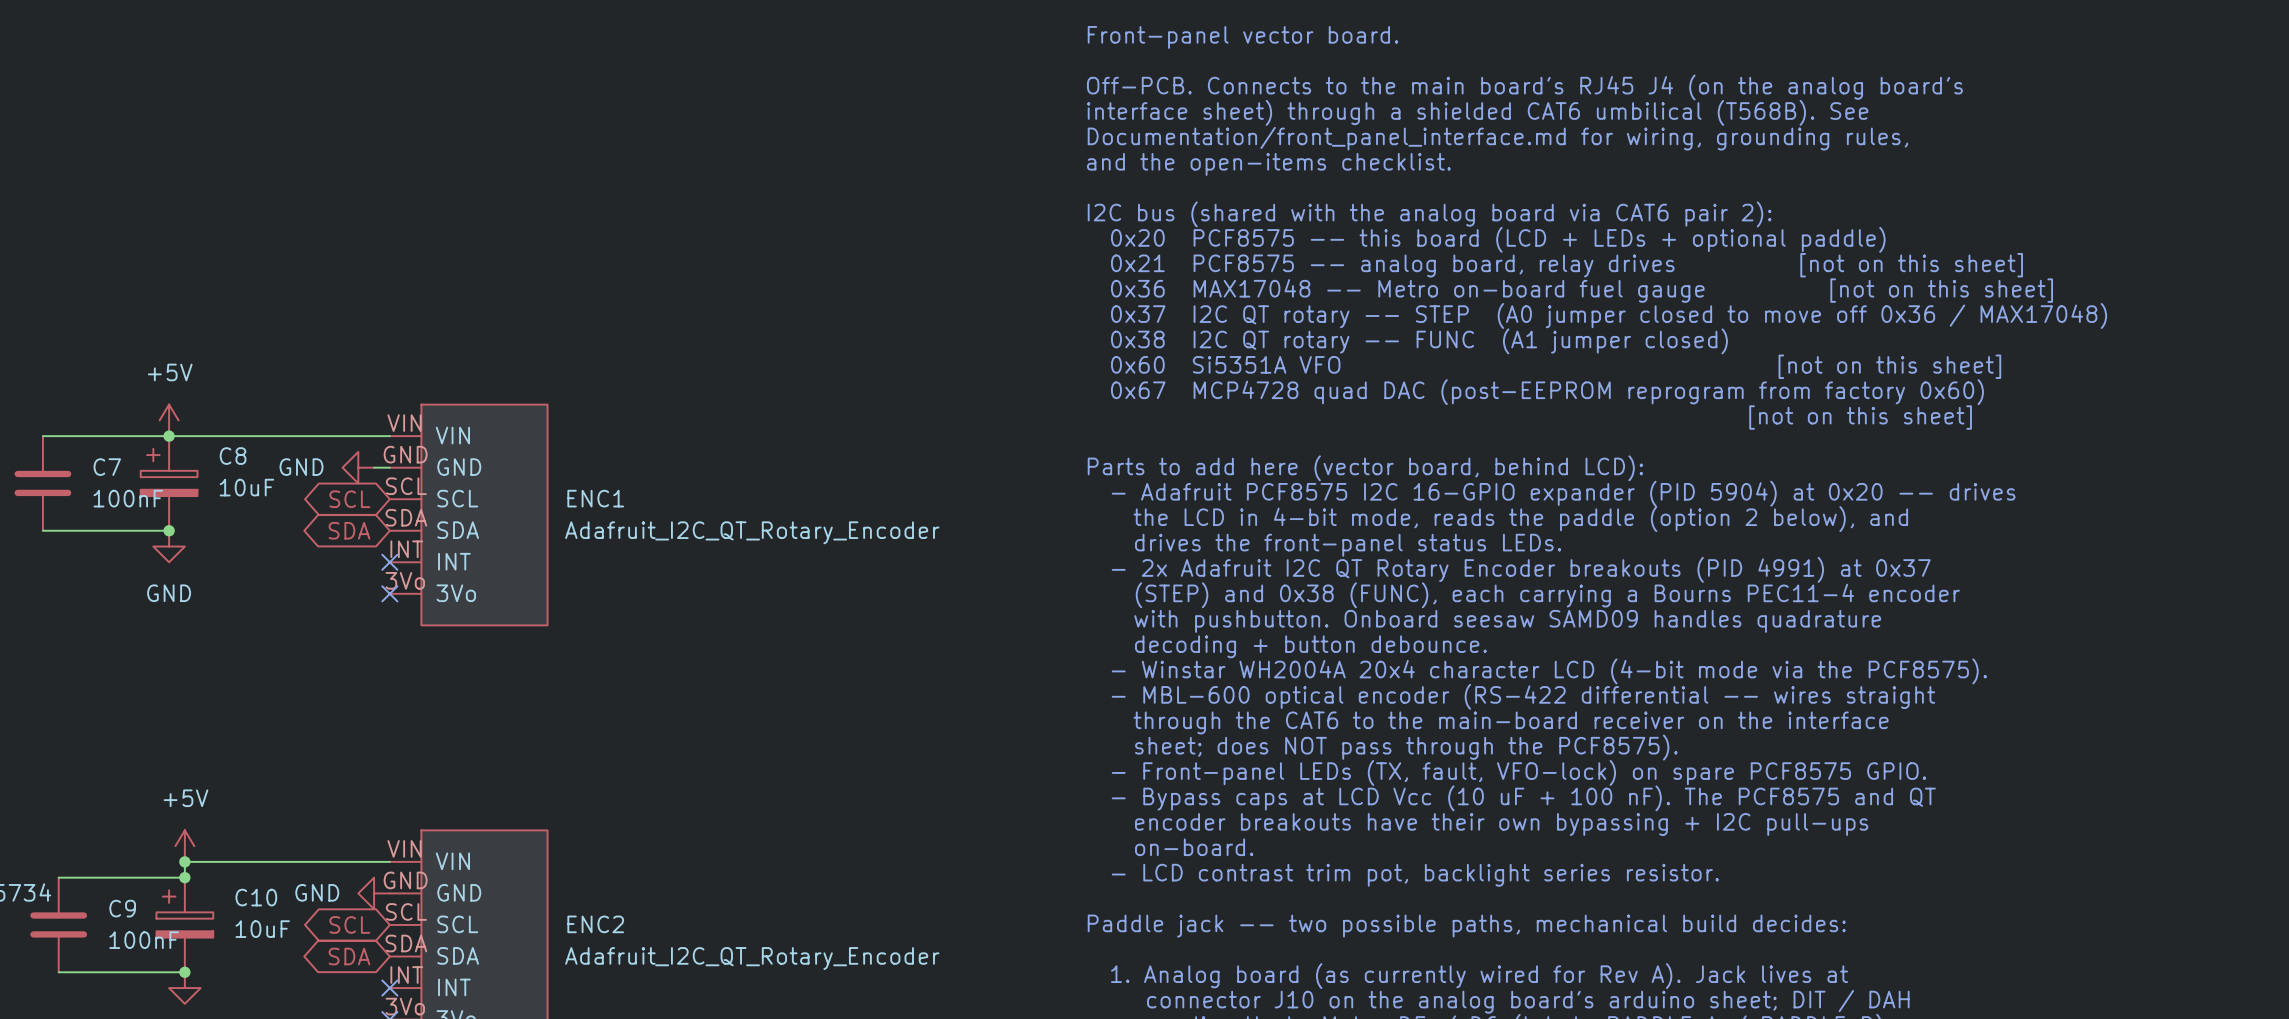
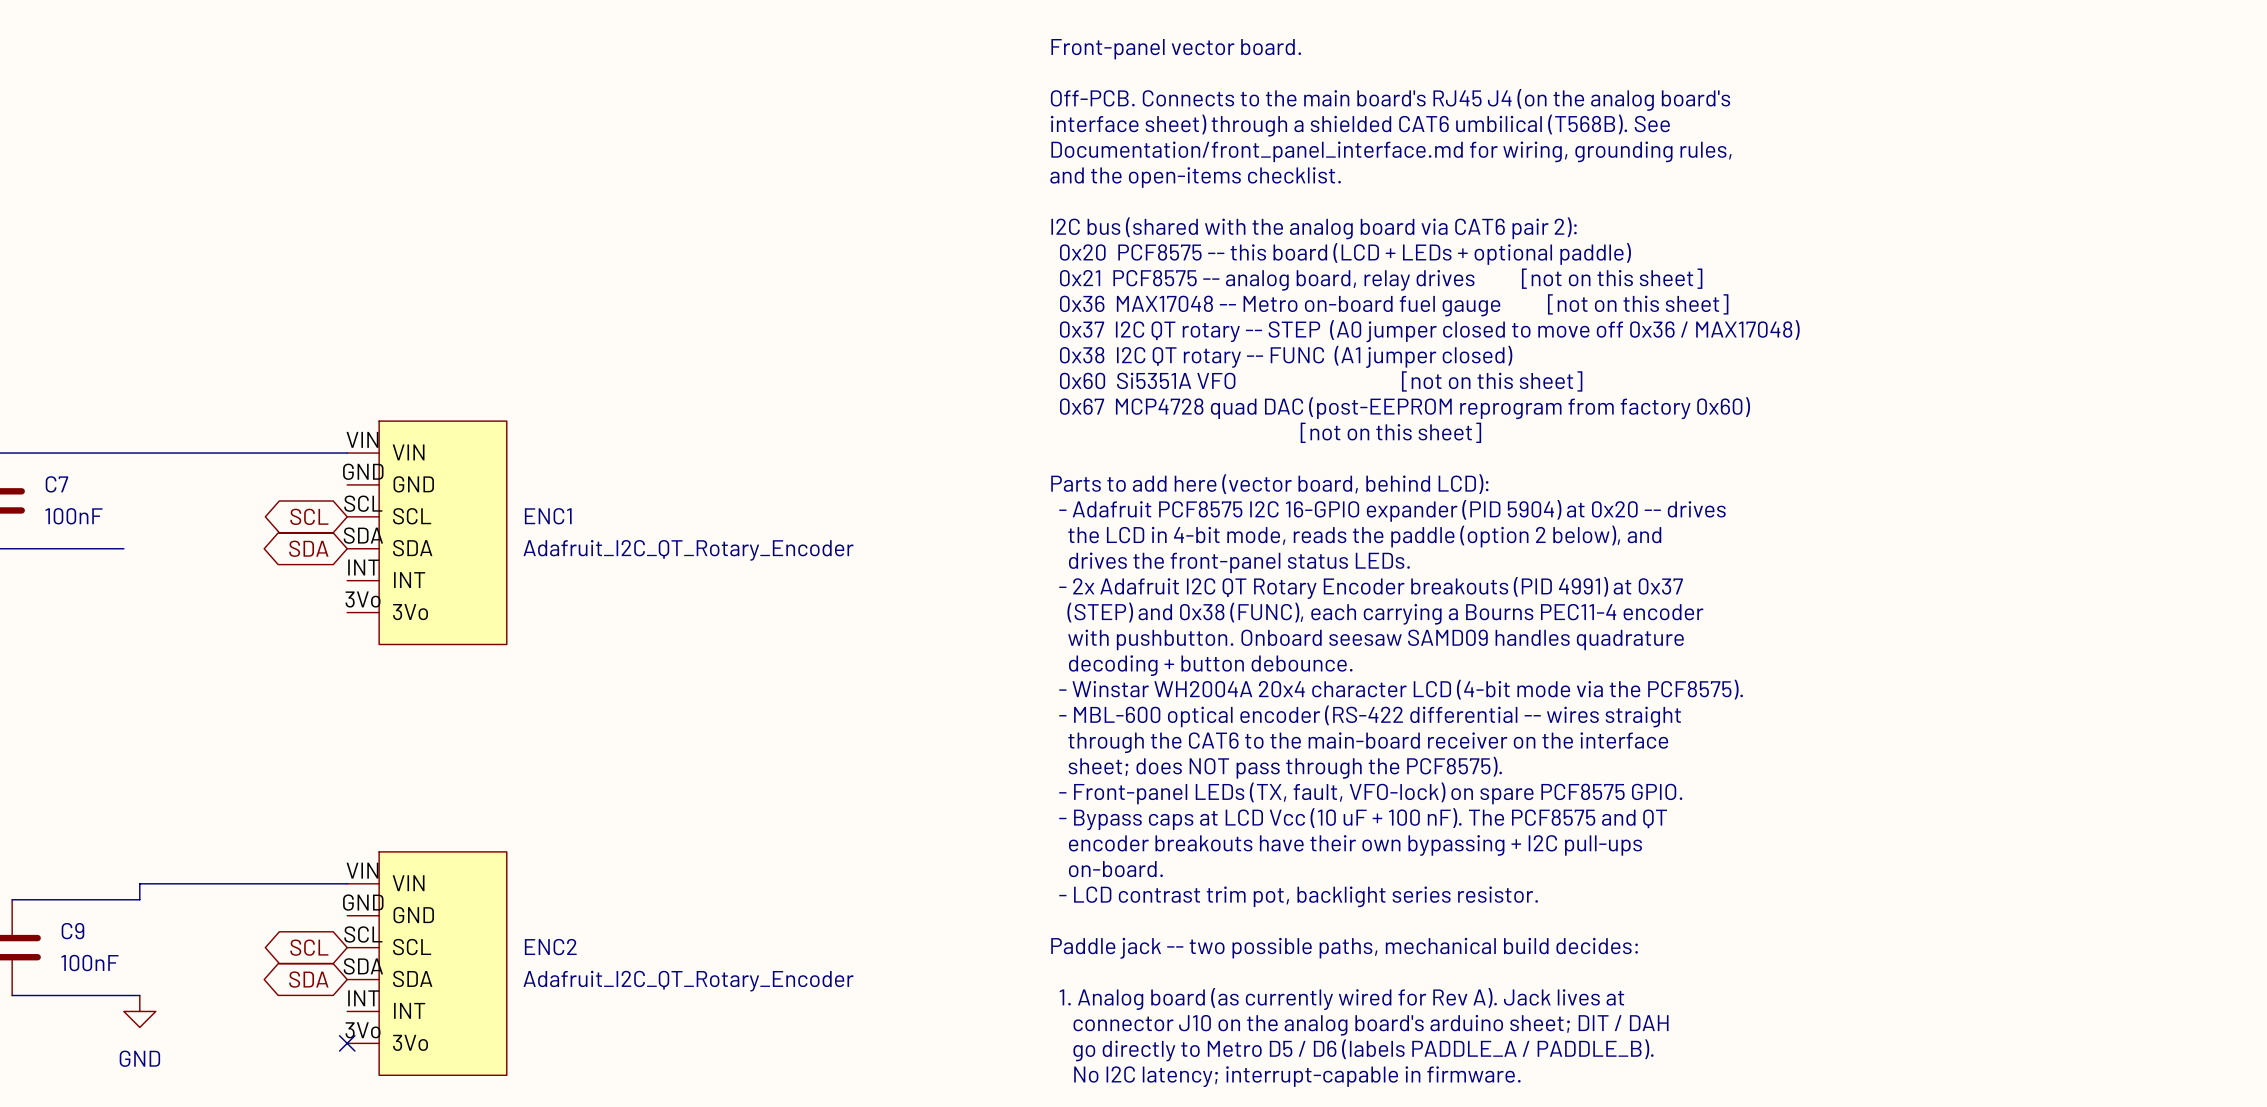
power symbol: +5V (169, 420) -> none
junction: (169, 436) -> none
power symbol: GND (358, 467) -> none
wire: (374, 467) (389, 467) -> none
C8: 10uF (169, 483) -> none
junction: (169, 530) -> none
power symbol: GND (169, 546) -> none
no-connect mark: (389, 562) -> none
no-connect mark: (389, 593) -> none
power symbol: +5V (184, 846) -> none
junction: (184, 861) -> none
junction: (184, 877) -> none
power symbol: GND (374, 893) -> none
C10: 10uF (184, 924) -> none
junction: (184, 972) -> none
no-connect mark: (389, 988) -> none

